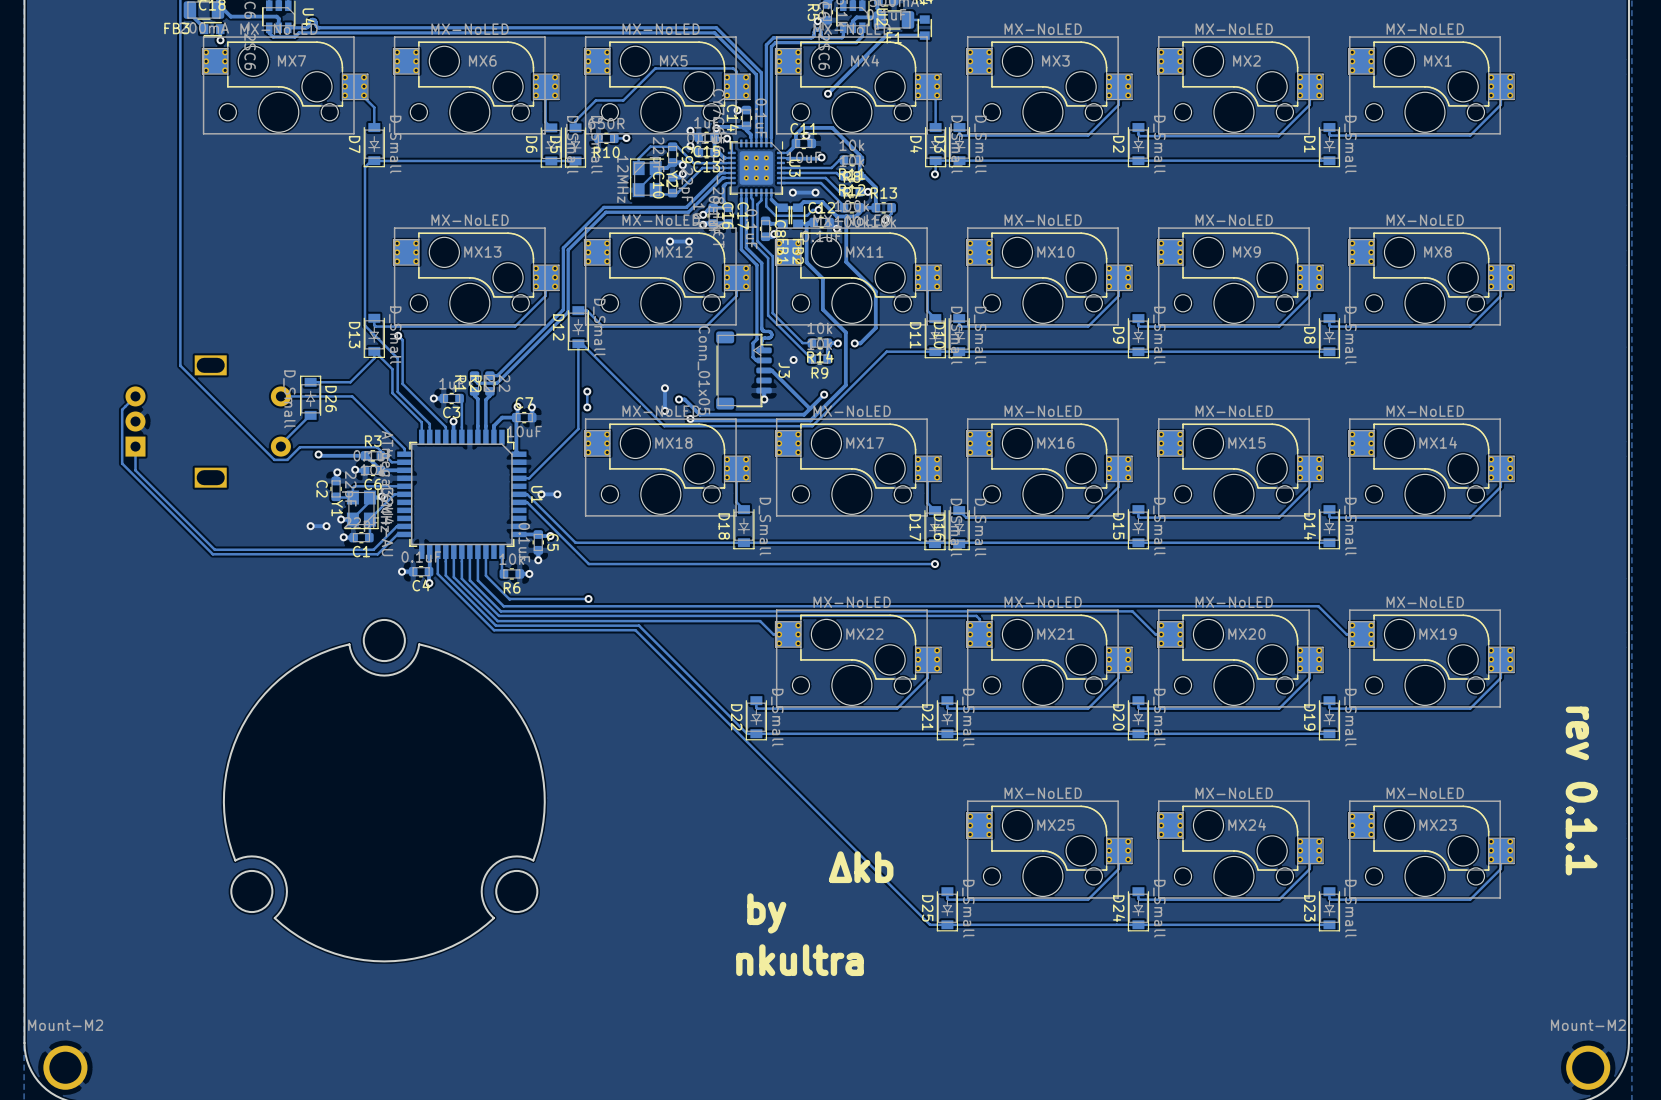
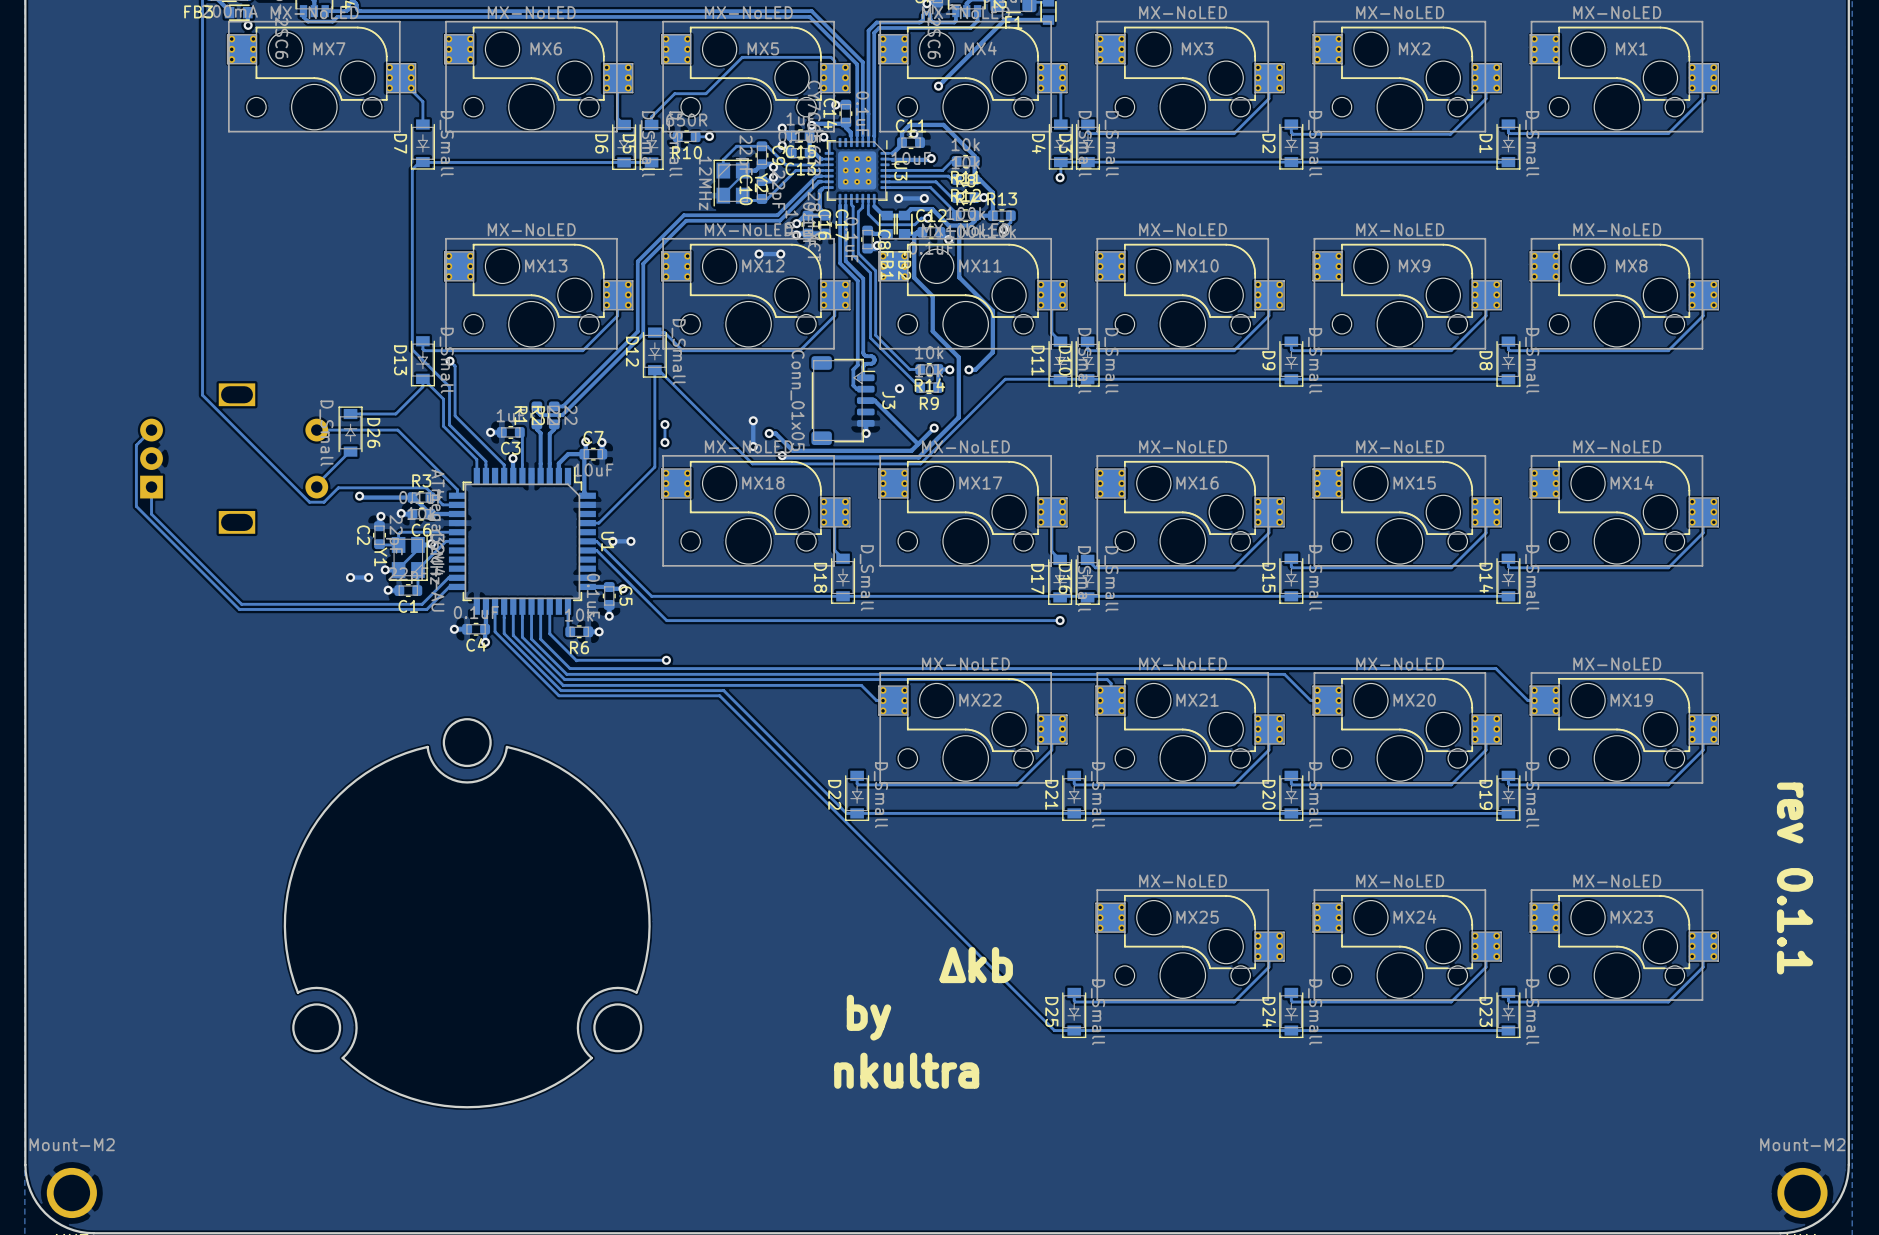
round board edge position: (384, 640) -> (467, 742)
board edge: (419, 644) (415, 656) (410, 663) (400, 671) (392, 674) (375, 674) (364, 669) (353, 656) (349, 644) (321, 653) (295, 667) (271, 686) (252, 709) (238, 734) (226, 772) (224, 812) (229, 841) (235, 860) (247, 856) (264, 858) (275, 865) (284, 879) (286, 891) (285, 900) (282, 908) (274, 918) (298, 936) (316, 946) (354, 958) (384, 961) (414, 958) (443, 950) (470, 936) (493, 918) (485, 908) (481, 896) (482, 883) (487, 871) (496, 862) (508, 857) (521, 856) (533, 860) (541, 832) (544, 802) (542, 772) (534, 744) (521, 717) (503, 693) (481, 673) (447, 653) (419, 644) -> (506, 746) (502, 760) (497, 768) (485, 777) (476, 781) (457, 781) (444, 775) (431, 760) (427, 746) (395, 757) (365, 773) (339, 794) (317, 820) (301, 849) (287, 892) (285, 937) (290, 971) (297, 992) (316, 987) (330, 990) (343, 998) (354, 1013) (356, 1023) (355, 1037) (349, 1050) (342, 1058) (369, 1079) (389, 1089) (433, 1104) (467, 1107) (501, 1104) (534, 1094) (564, 1079) (591, 1058) (582, 1046) (578, 1033) (578, 1018) (584, 1005) (595, 995) (608, 989) (622, 988) (636, 992) (646, 960) (649, 926) (646, 892) (637, 860) (622, 829) (602, 802) (577, 779) (539, 757) (506, 746)
round board edge position: (251, 891) -> (316, 1027)
round board edge position: (516, 891) -> (617, 1027)

